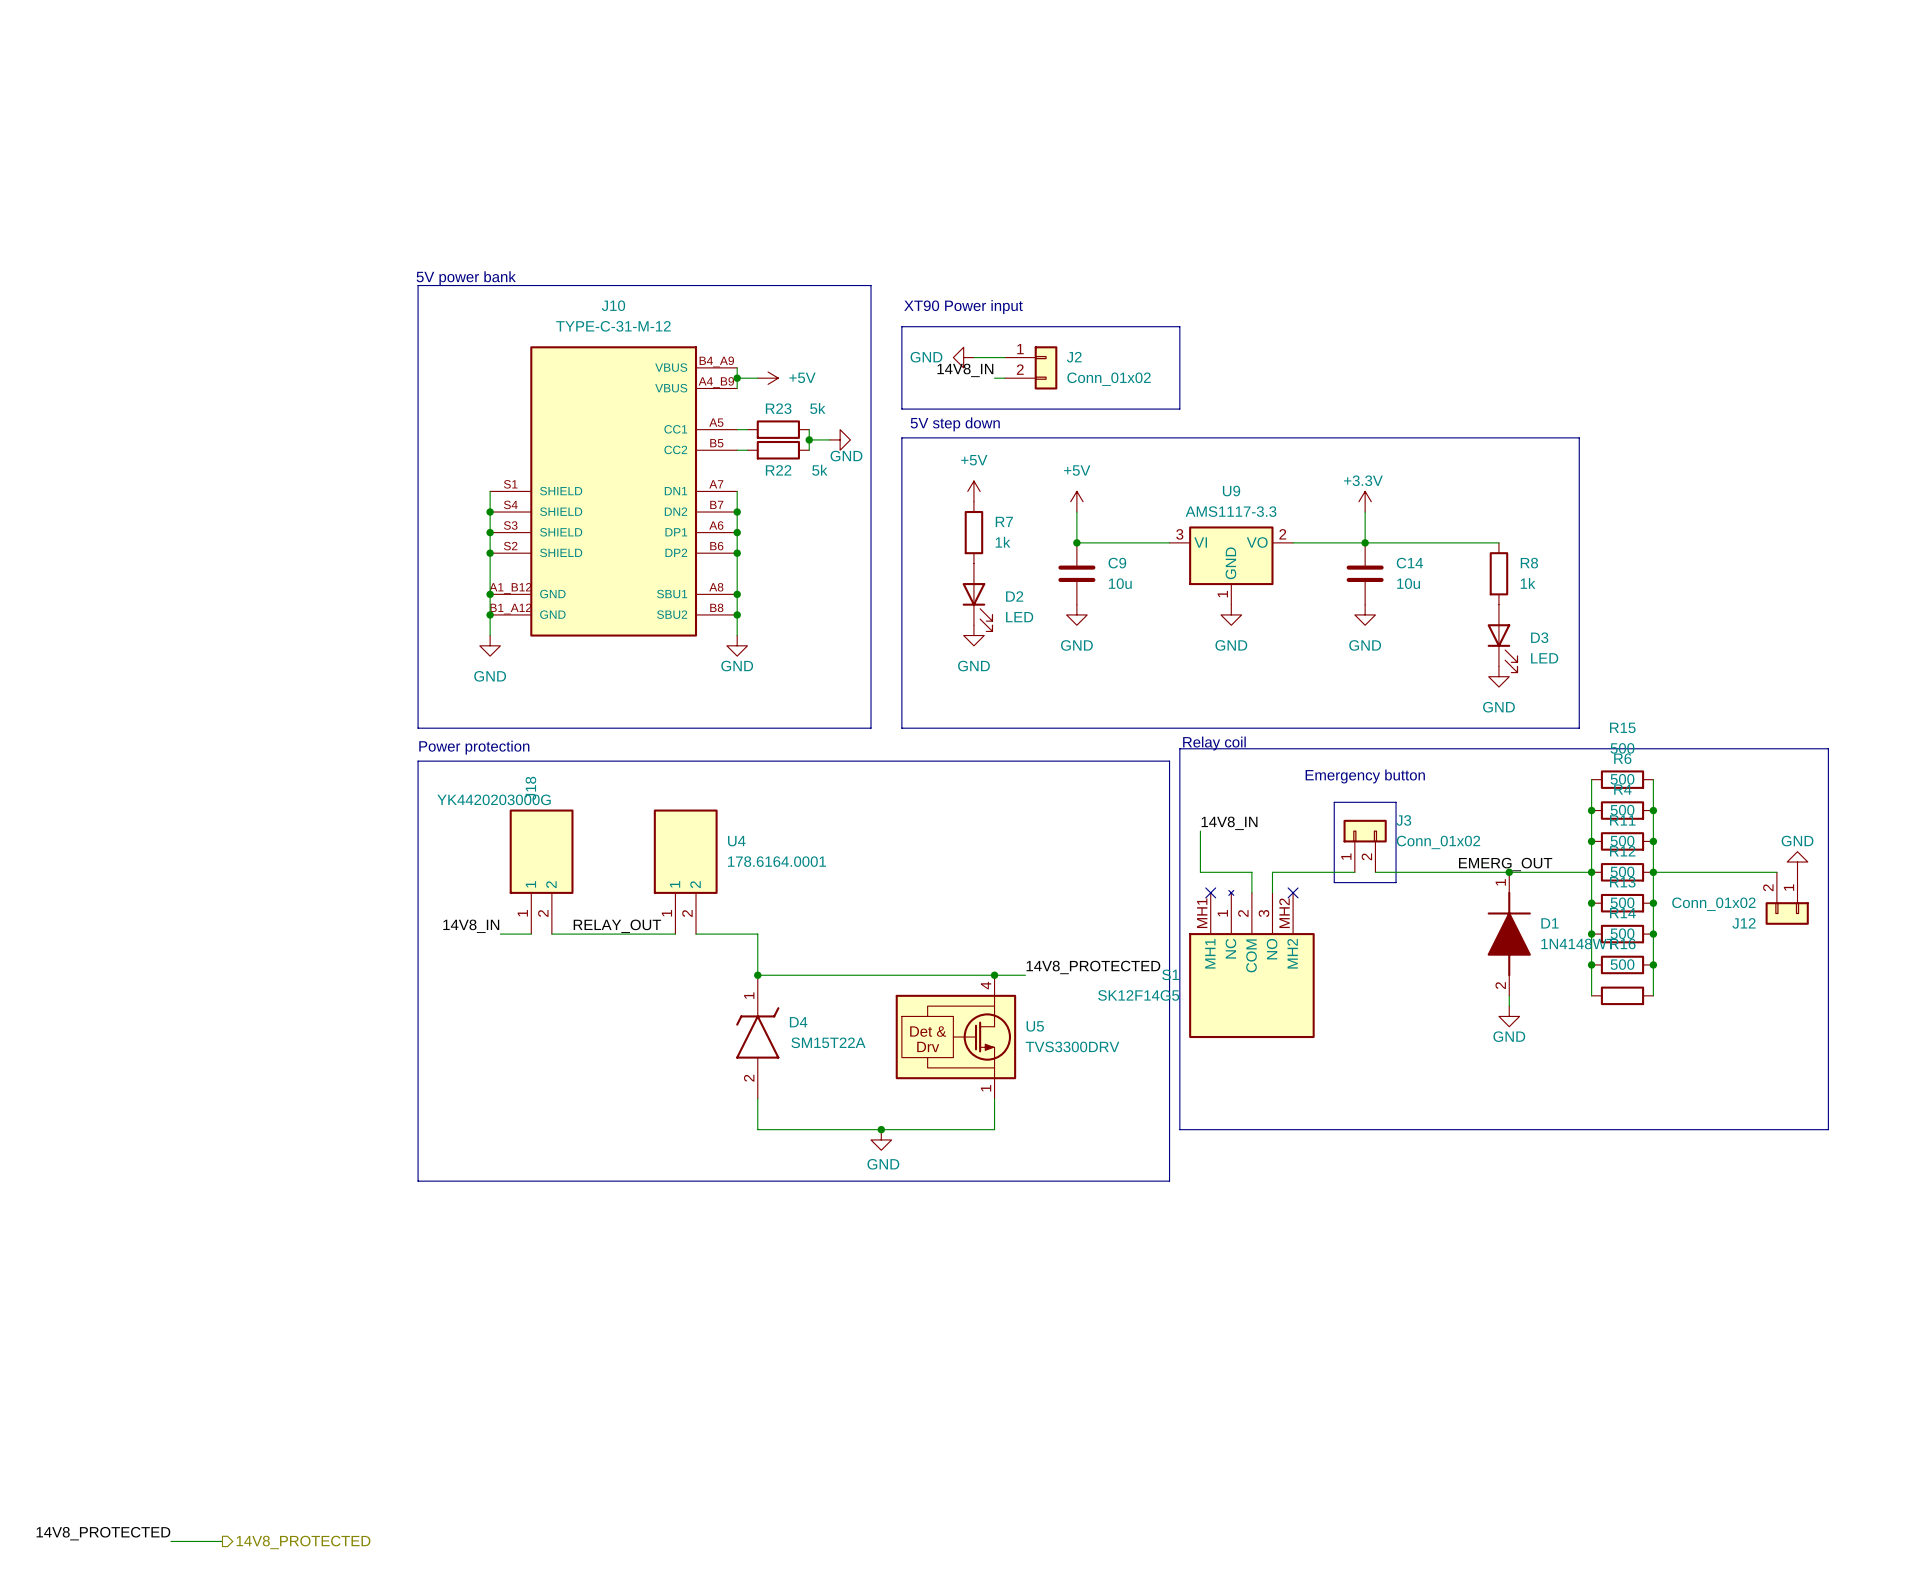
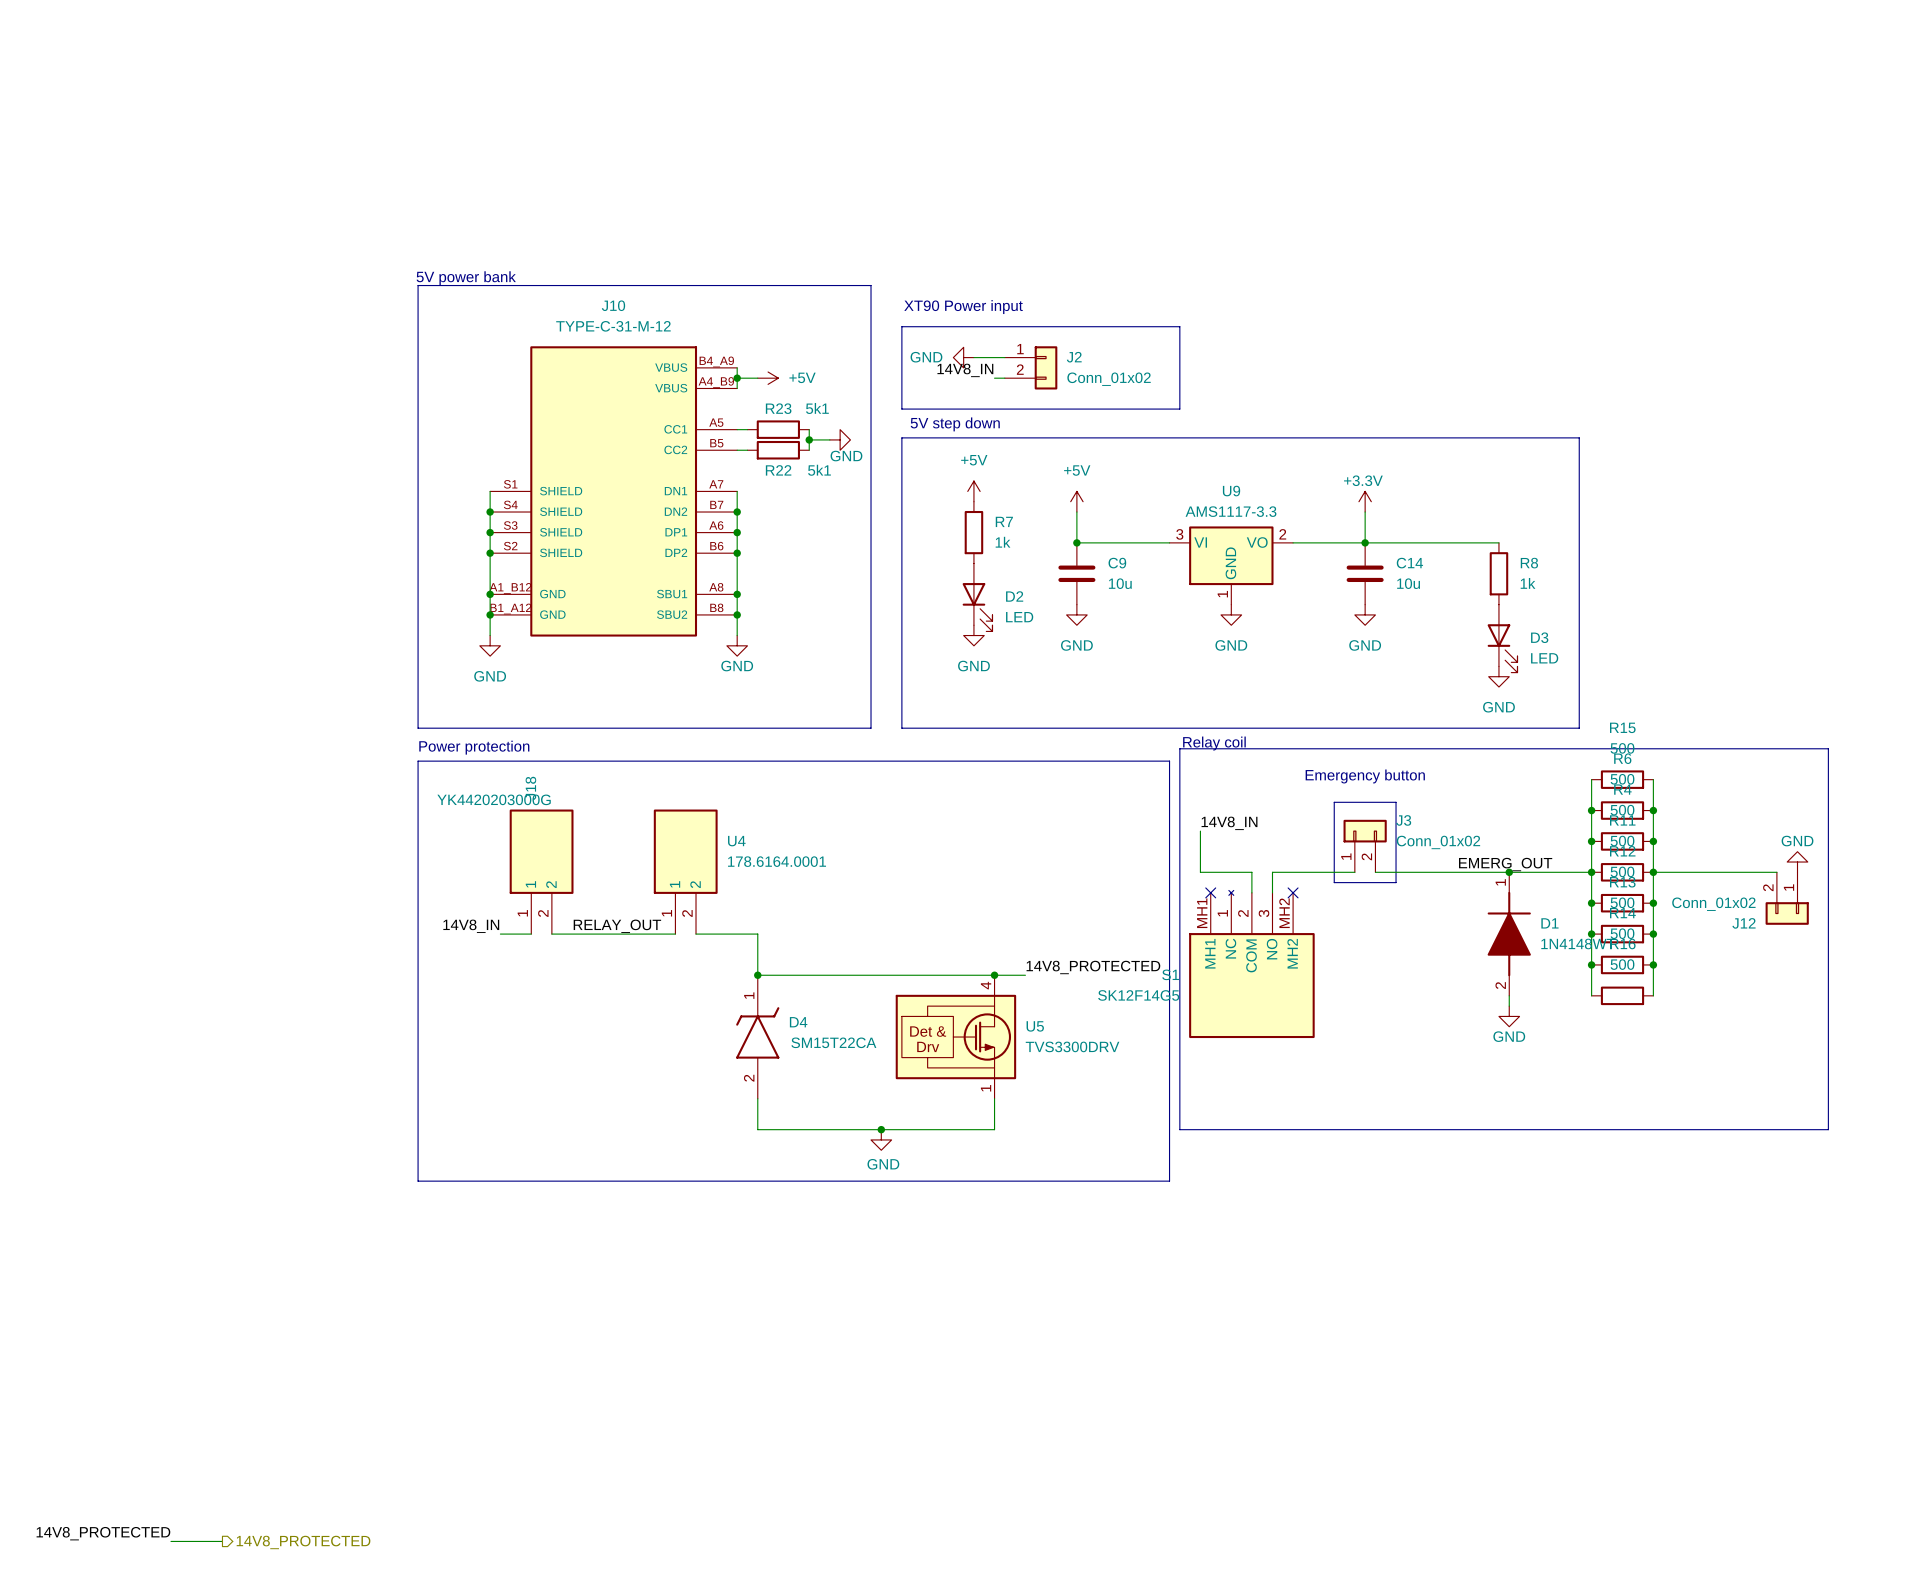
R23 value: 5k (817, 408) -> 5k1 (817, 408)
R22 value: 5k (819, 470) -> 5k1 (819, 470)
D4 value: SM15T22A (828, 1042) -> SM15T22CA (833, 1042)

